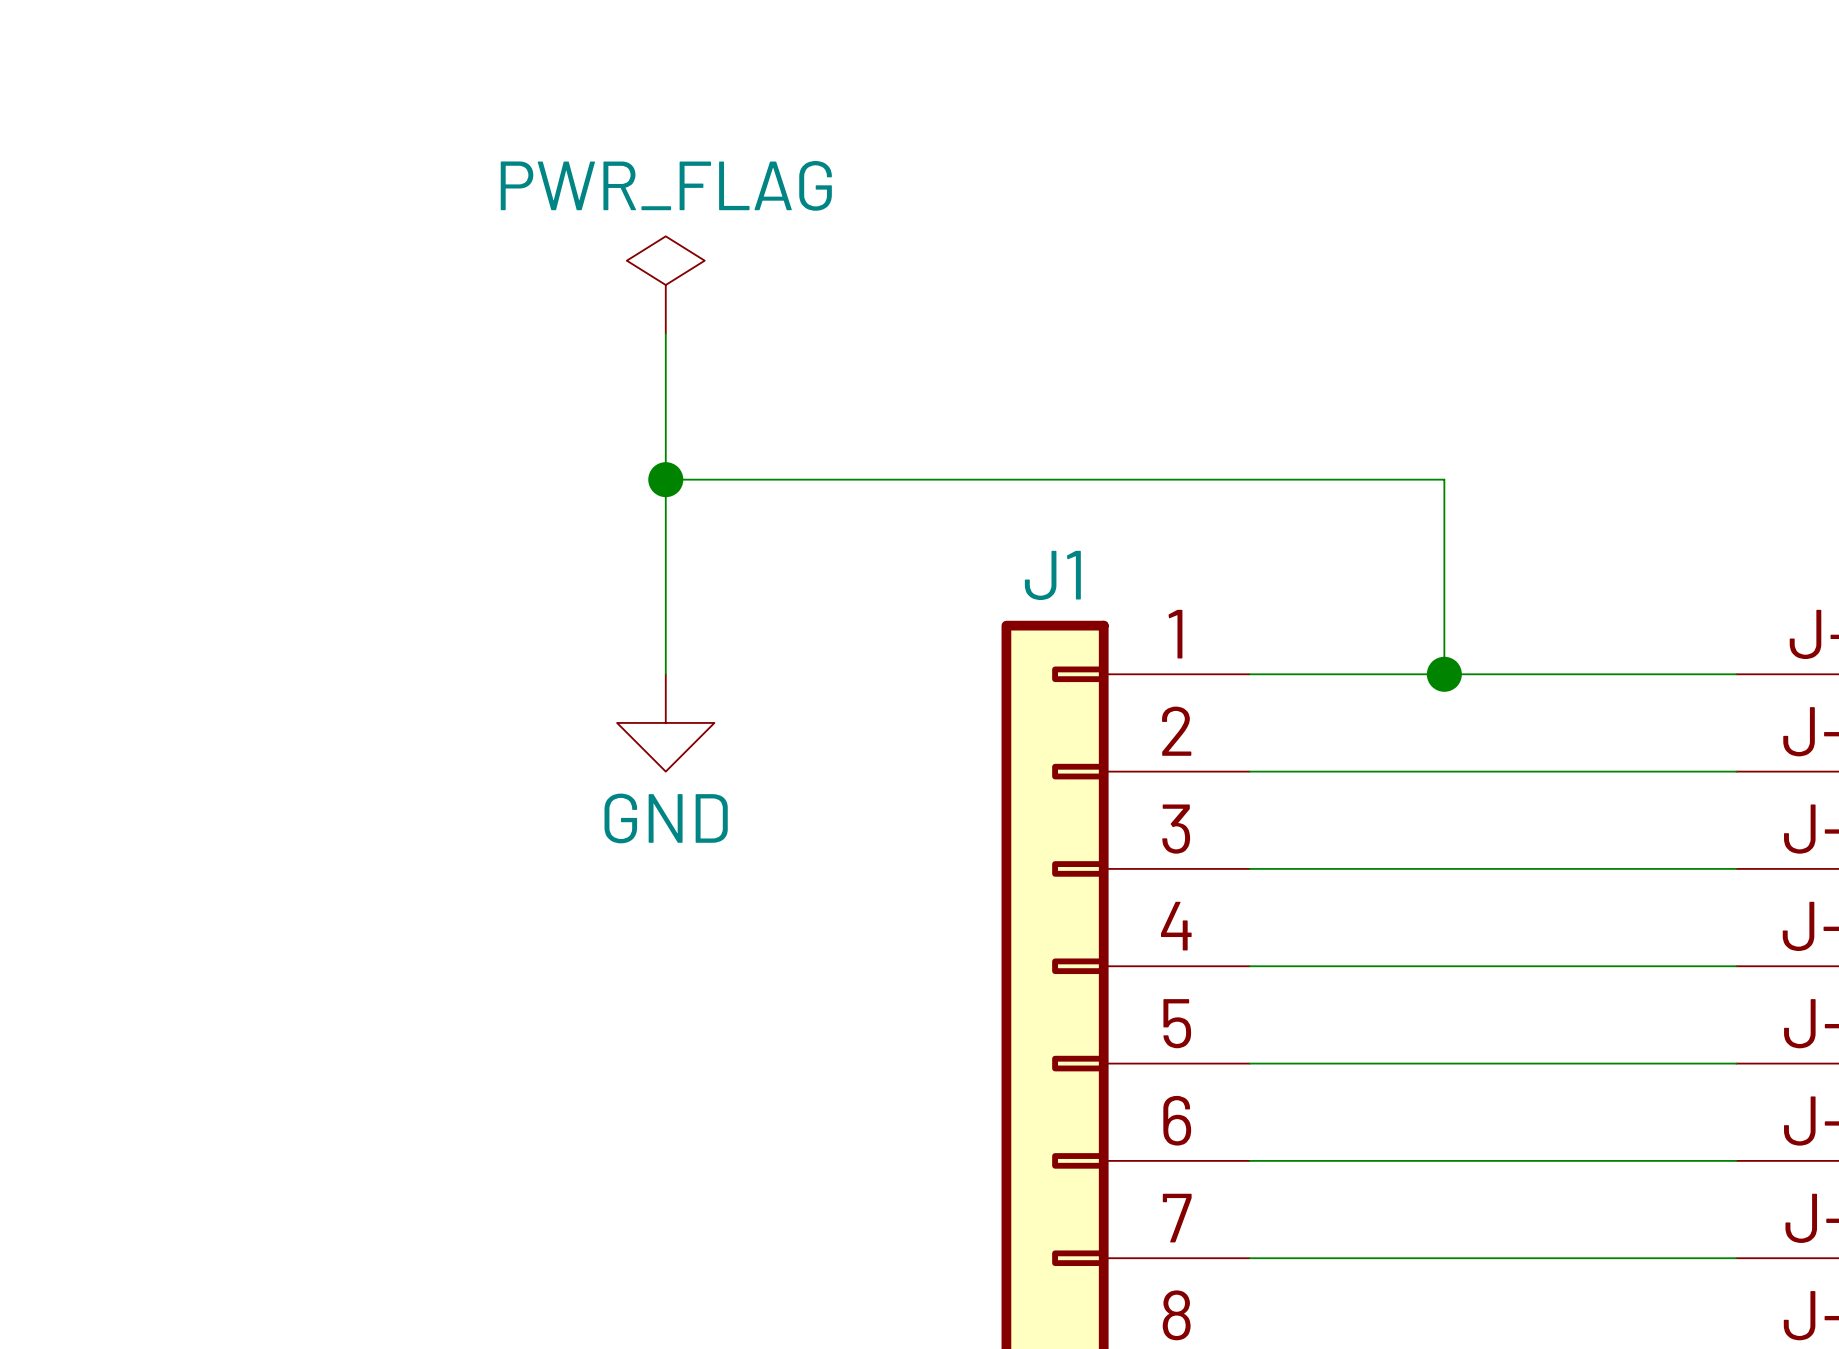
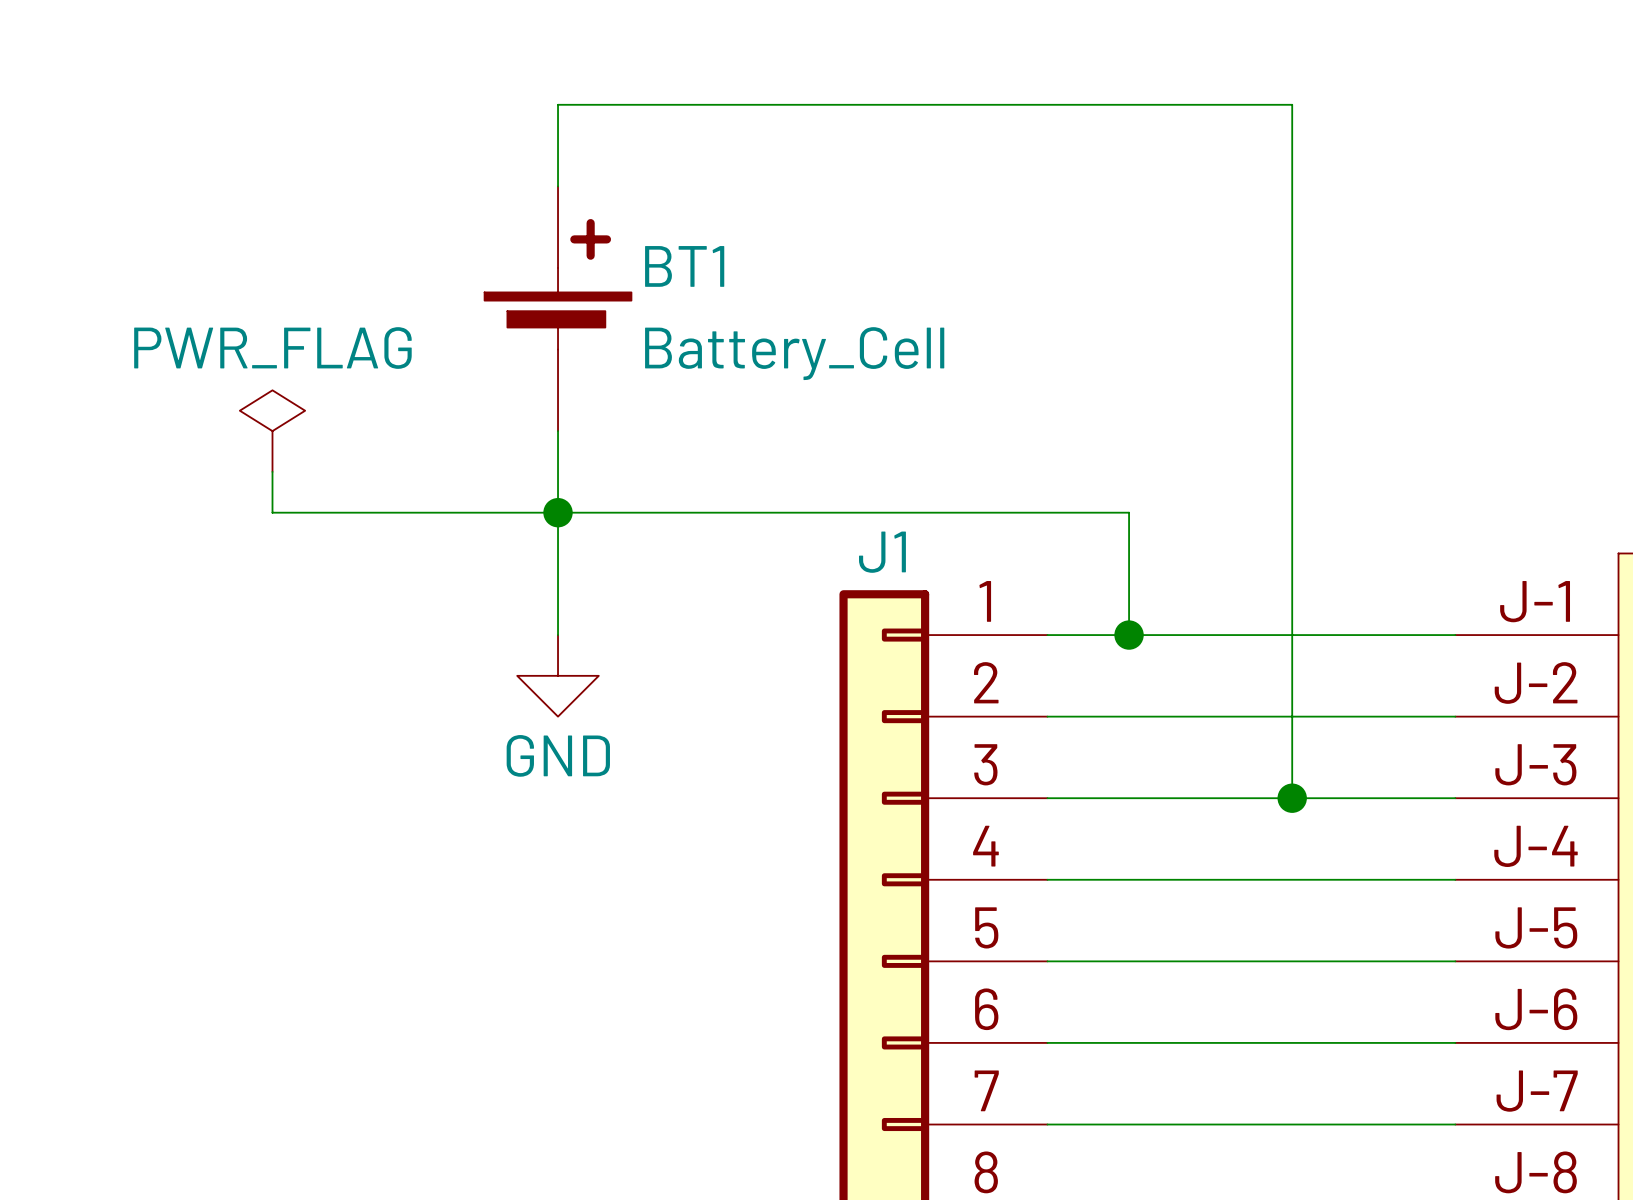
wire: none -> (558, 186) (558, 104) (1292, 104) (1292, 798)
power symbol position: PWR_FLAG (665, 285) -> PWR_FLAG (272, 431)
BT1: none -> Battery_Cell (558, 308)
wire: none -> (272, 471) (272, 512) (1129, 512) (1129, 635)
wire: (665, 479) (1444, 479) (1444, 674) -> none
junction position: (665, 479) -> (558, 512)
junction position: (1444, 674) -> (1129, 635)
junction: none -> (1292, 798)

